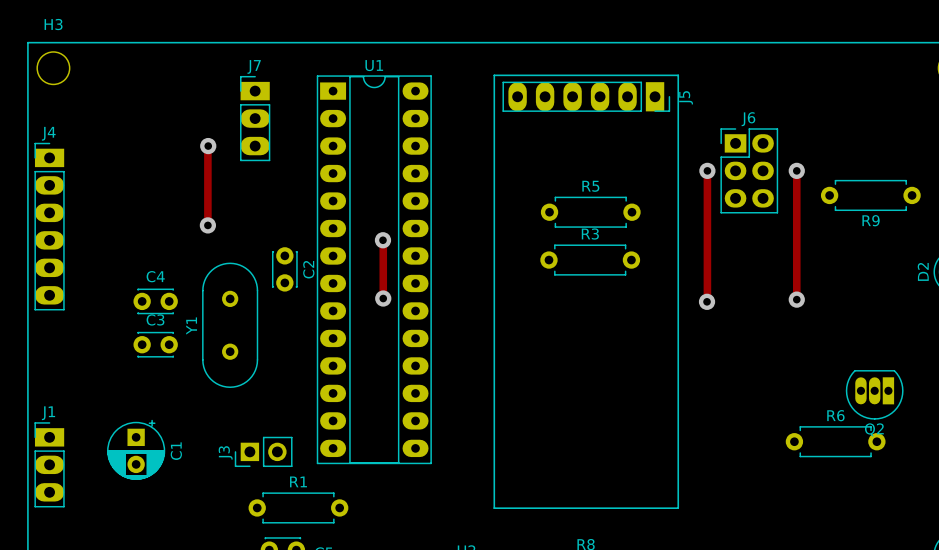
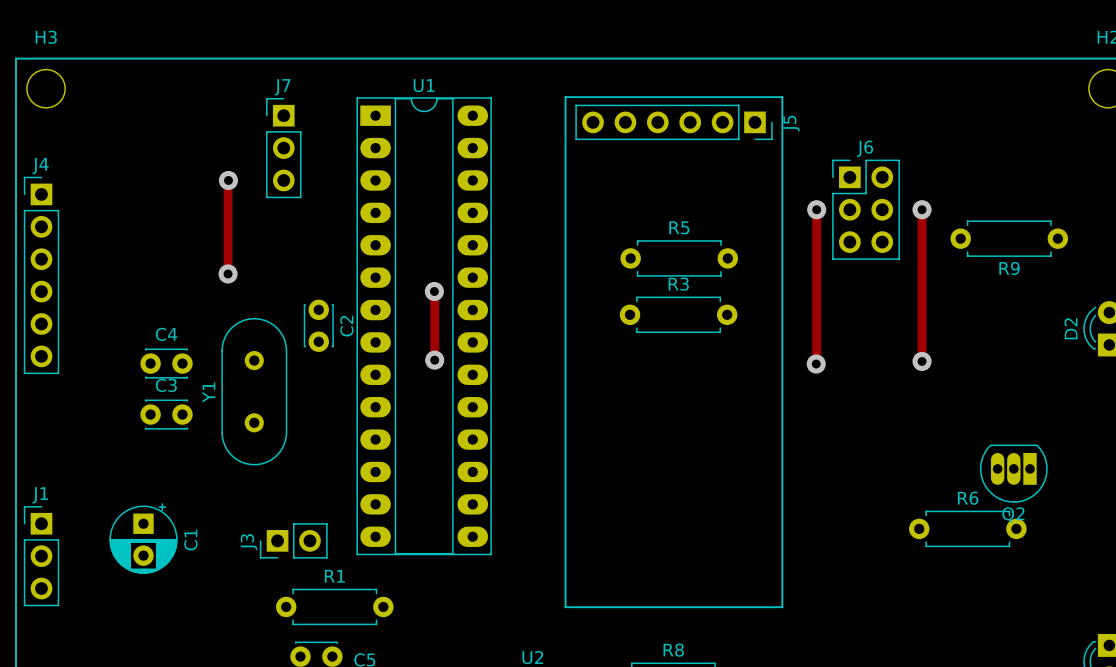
J7 footprint: [240, 76, 271, 162] -> [266, 97, 302, 199]
J5 footprint: [502, 81, 671, 112] -> [575, 104, 773, 141]
J6 footprint: [720, 128, 779, 214] -> [832, 159, 900, 260]
J4 footprint: [34, 142, 65, 311] -> [23, 176, 60, 375]
J1 footprint: [34, 422, 65, 508] -> [23, 506, 60, 607]

